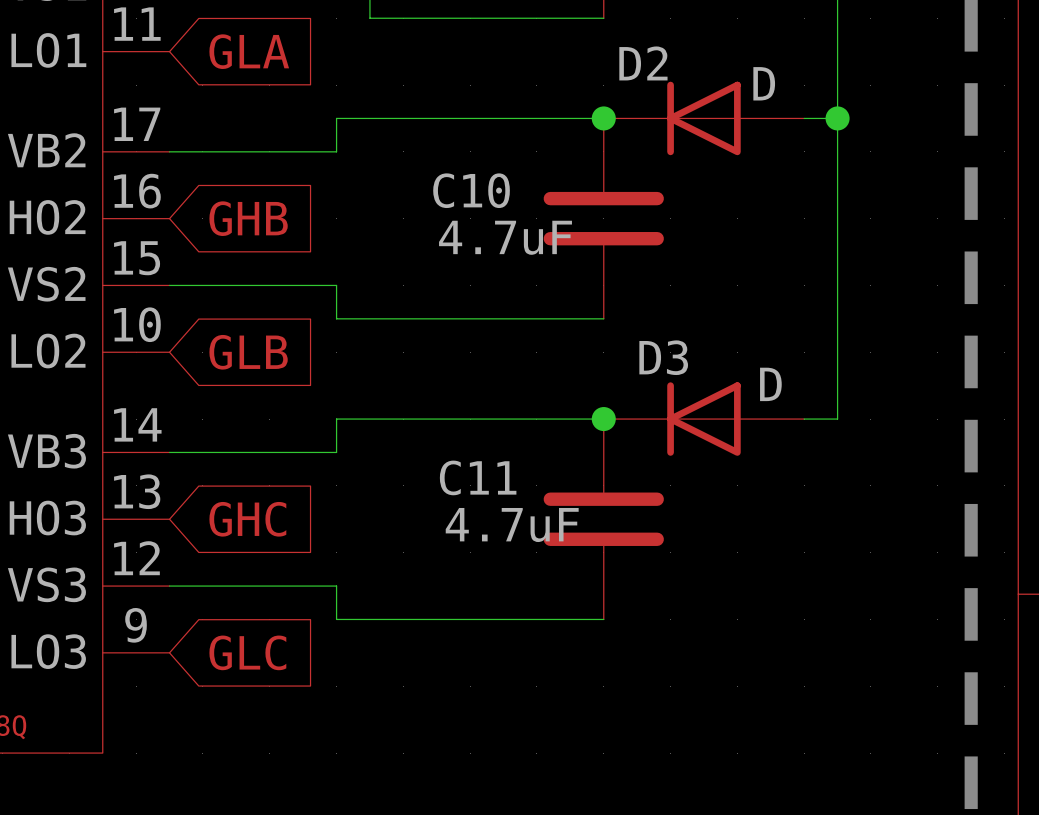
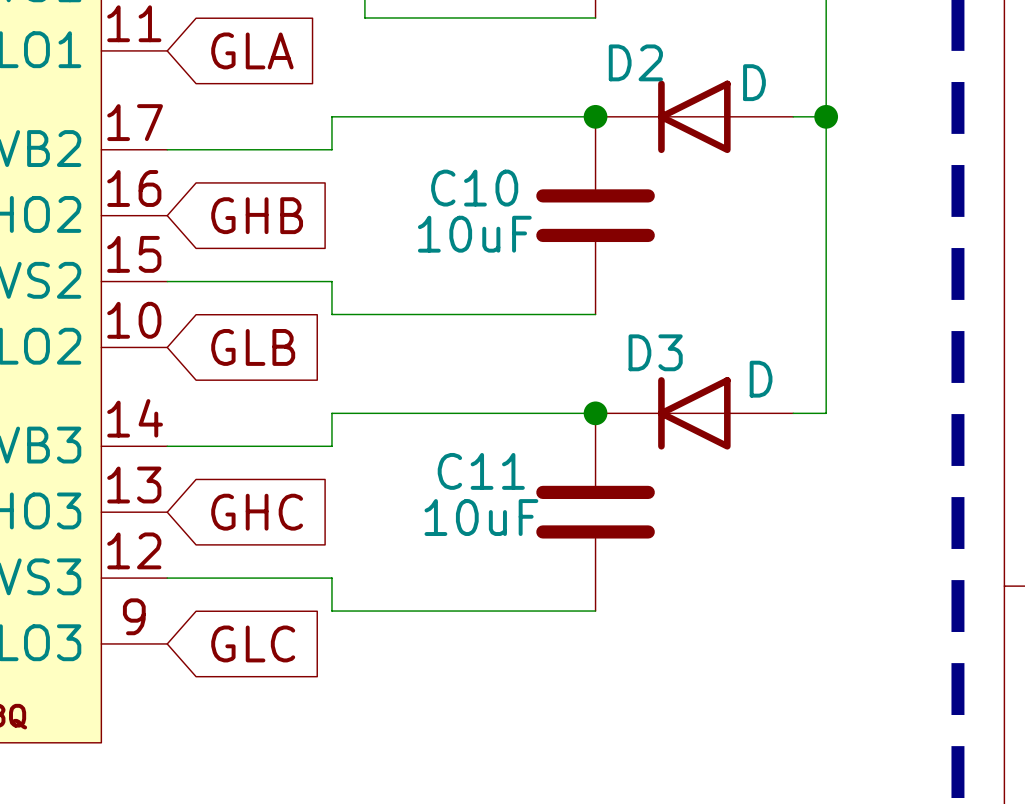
C10 value: 4.7uF (505, 237) -> 10uF (474, 234)
C11 value: 4.7uF (512, 525) -> 10uF (481, 517)

